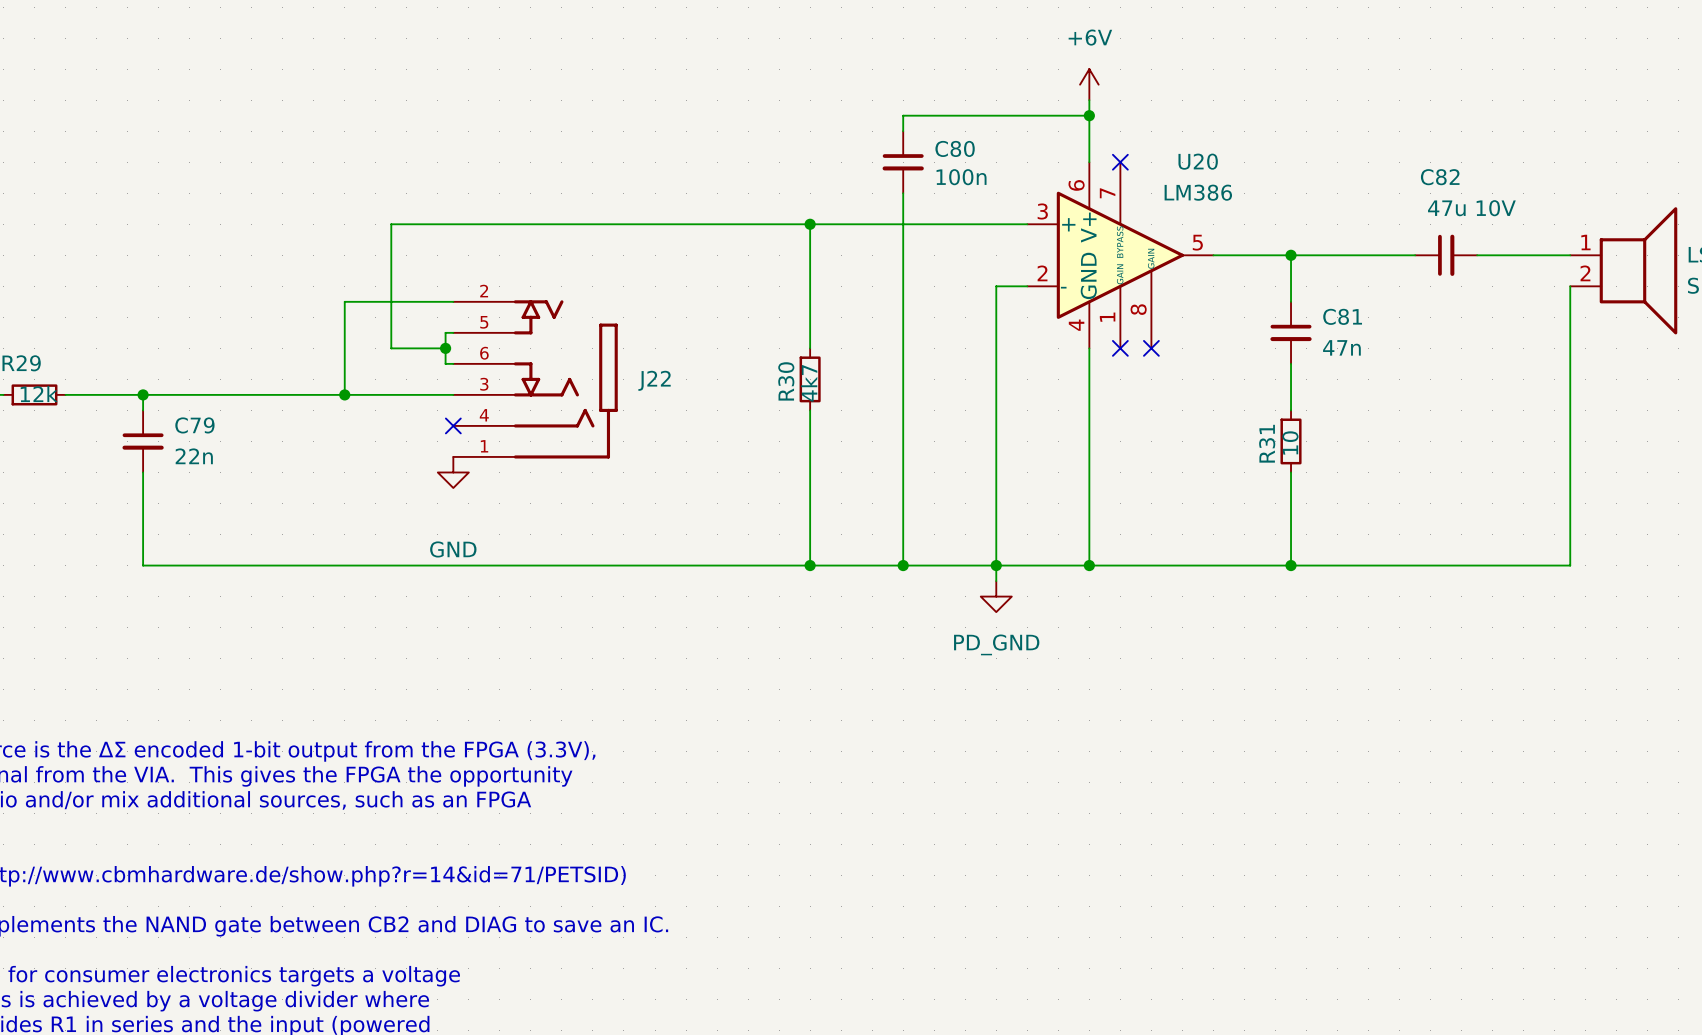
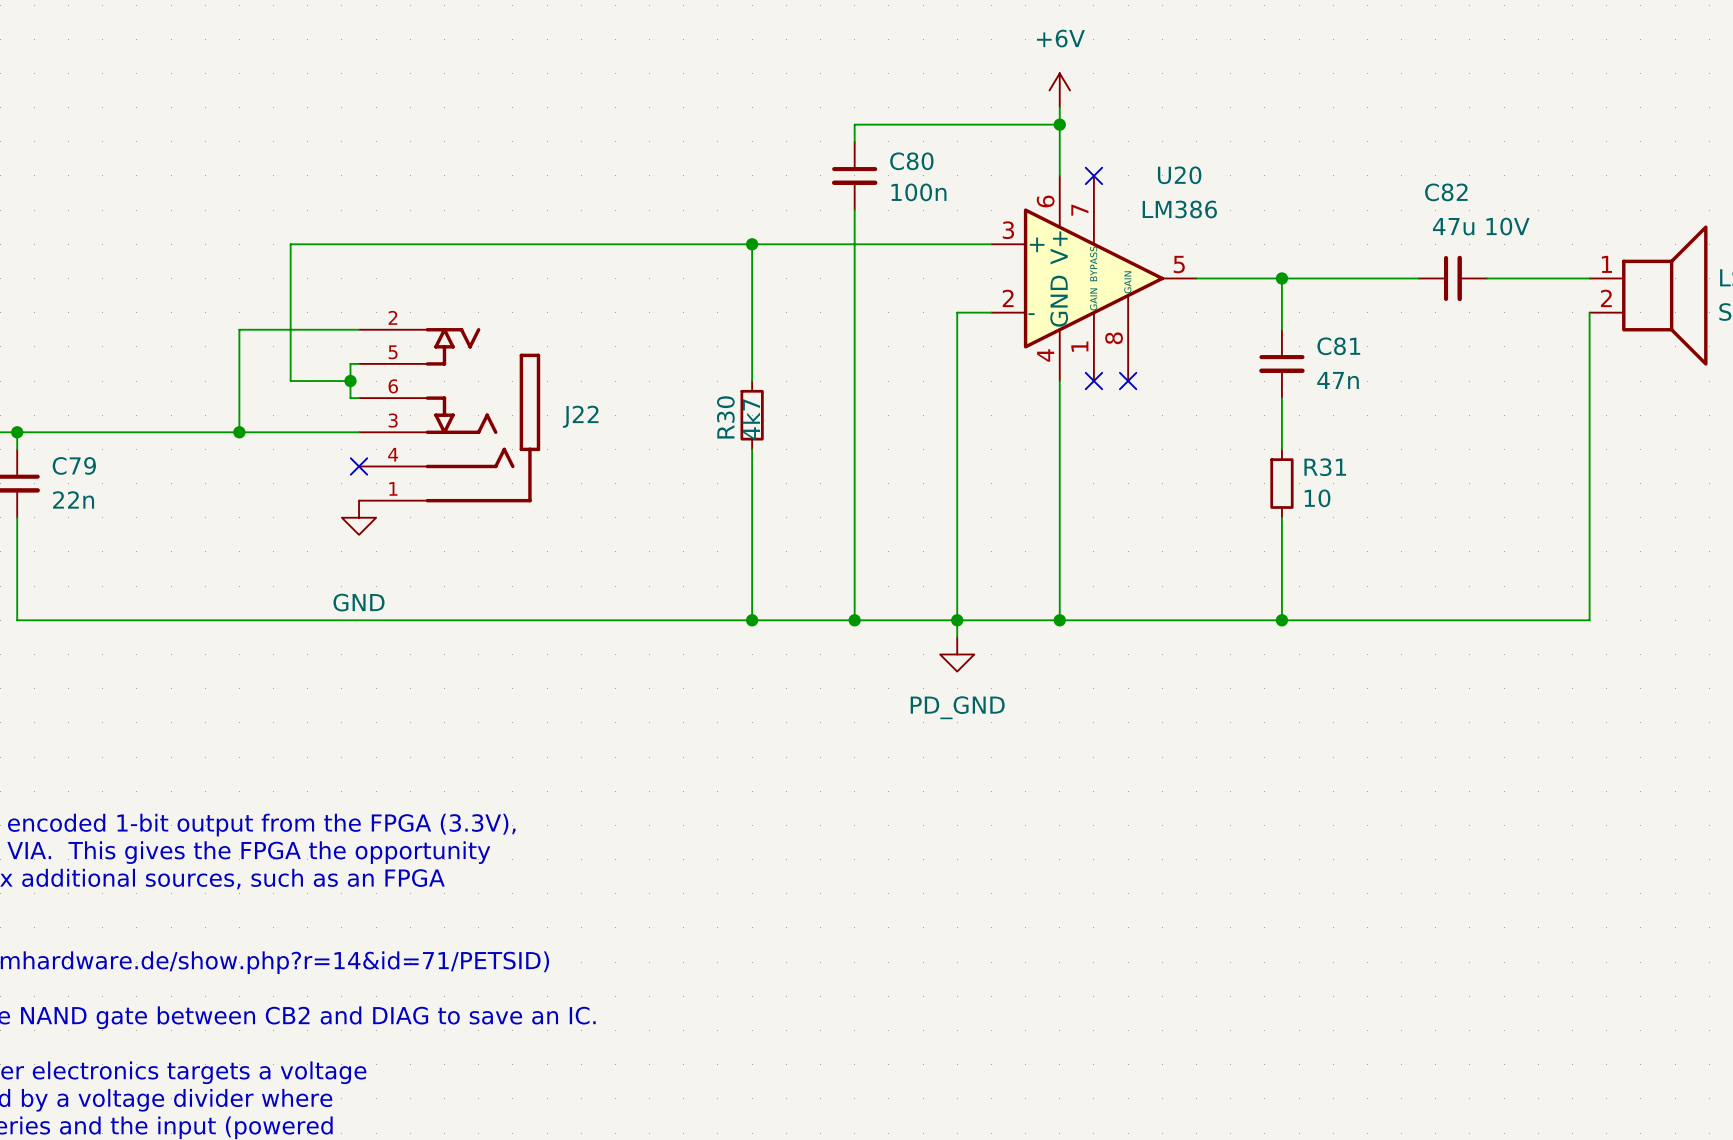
R31 value rotation: 0° (1290, 442) -> 90° clockwise (1317, 498)
R31 value position: 10 (1290, 442) -> 10 (1317, 498)
R31 name rotation: 0° (1267, 443) -> 90° clockwise (1325, 467)
R31 name position: R31 (1267, 443) -> R31 (1325, 467)

